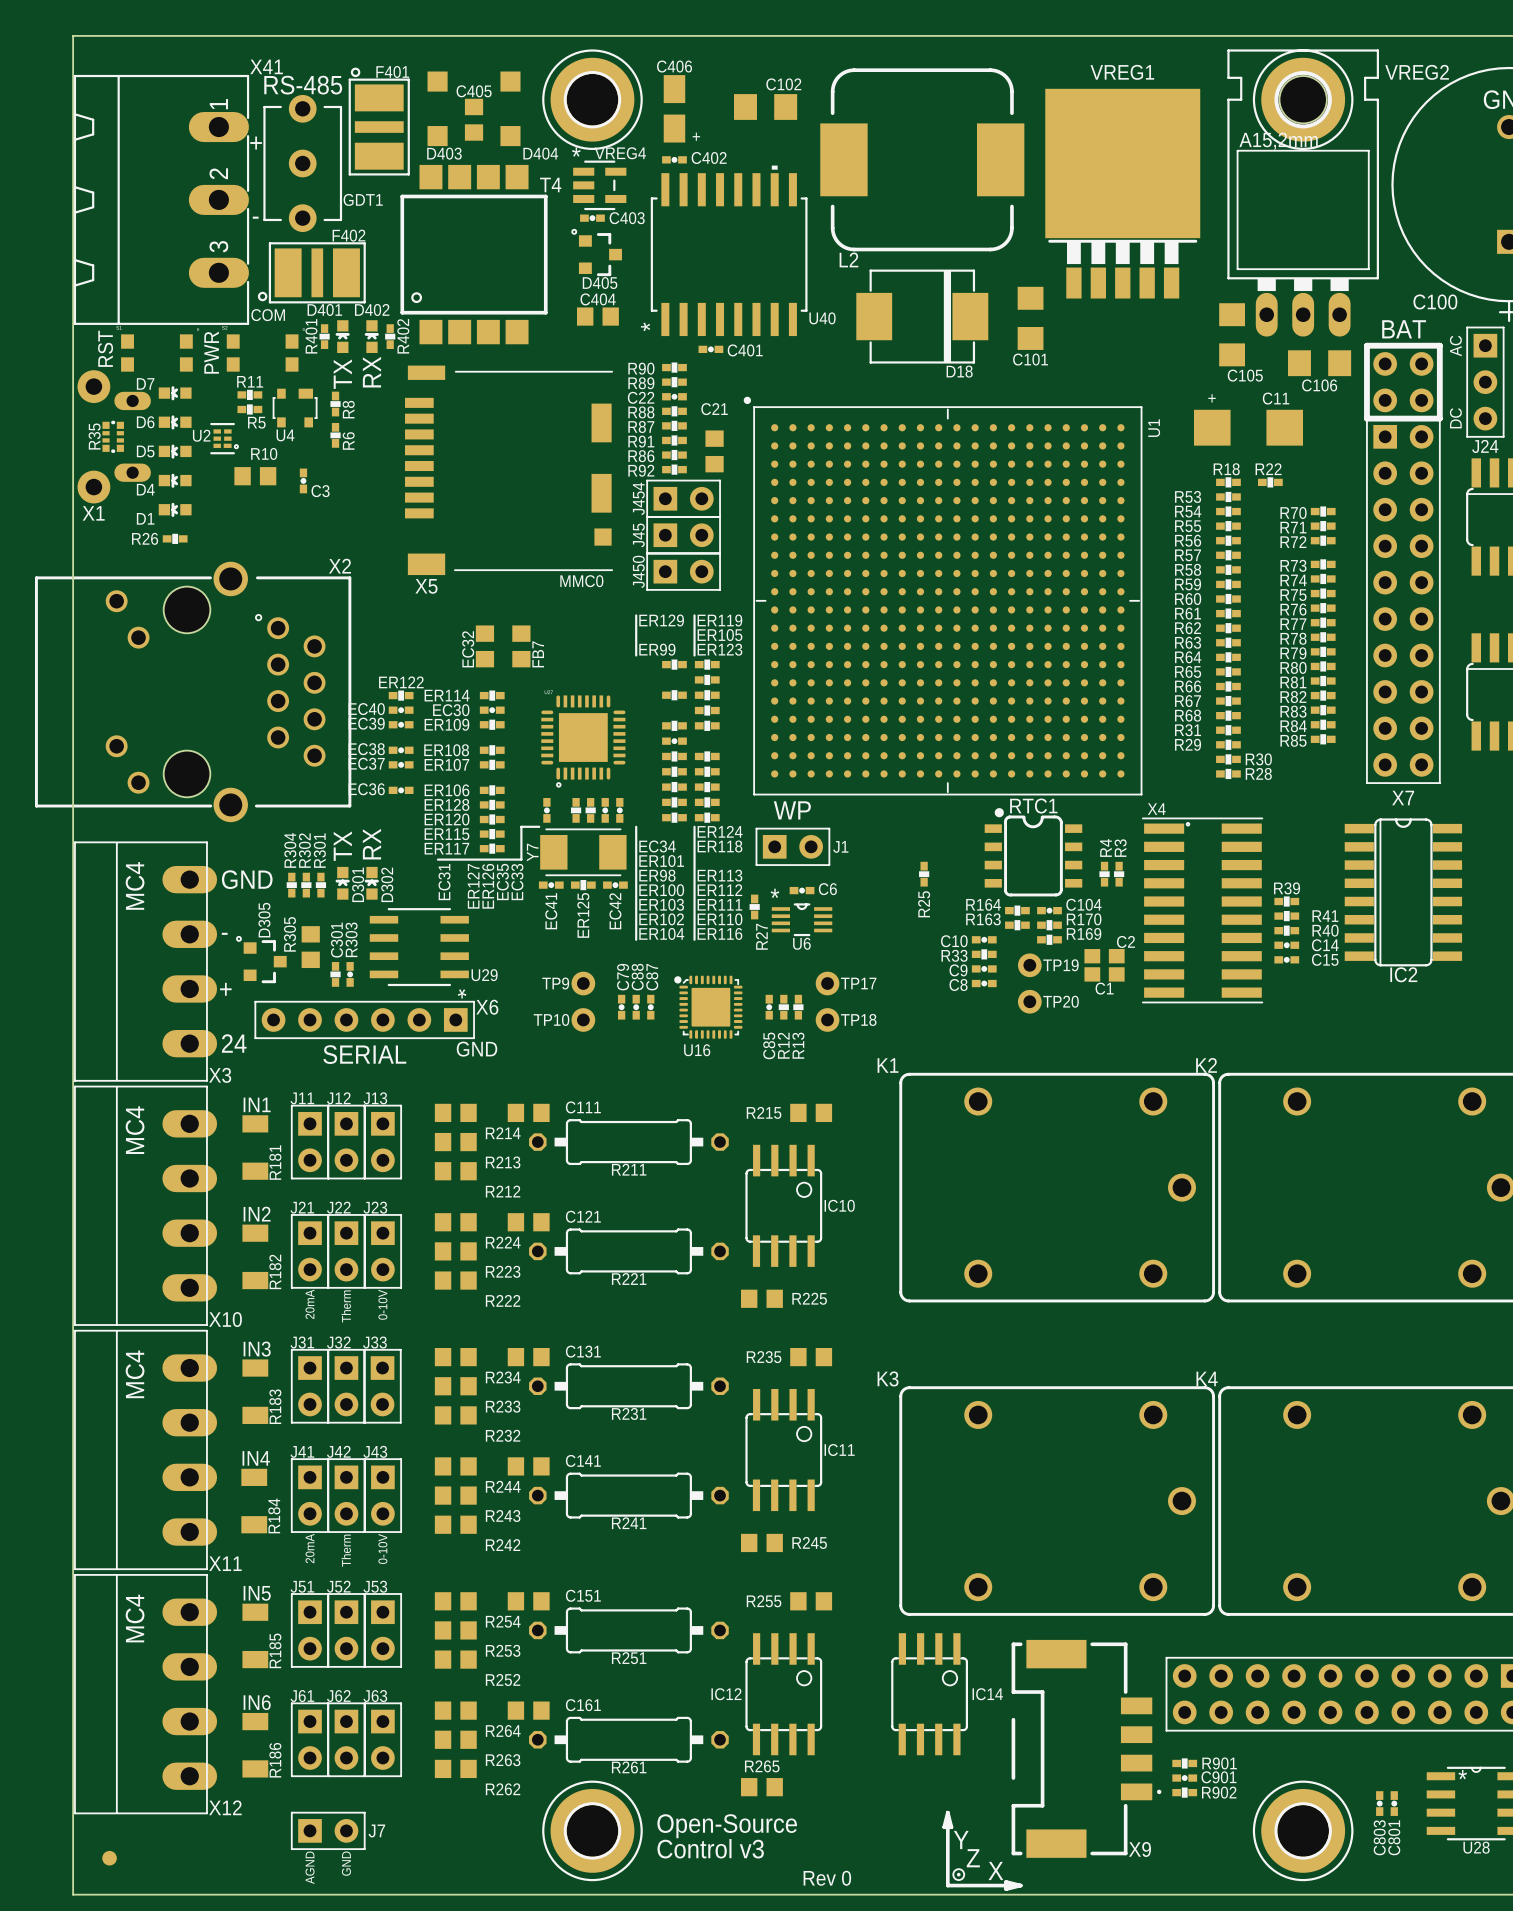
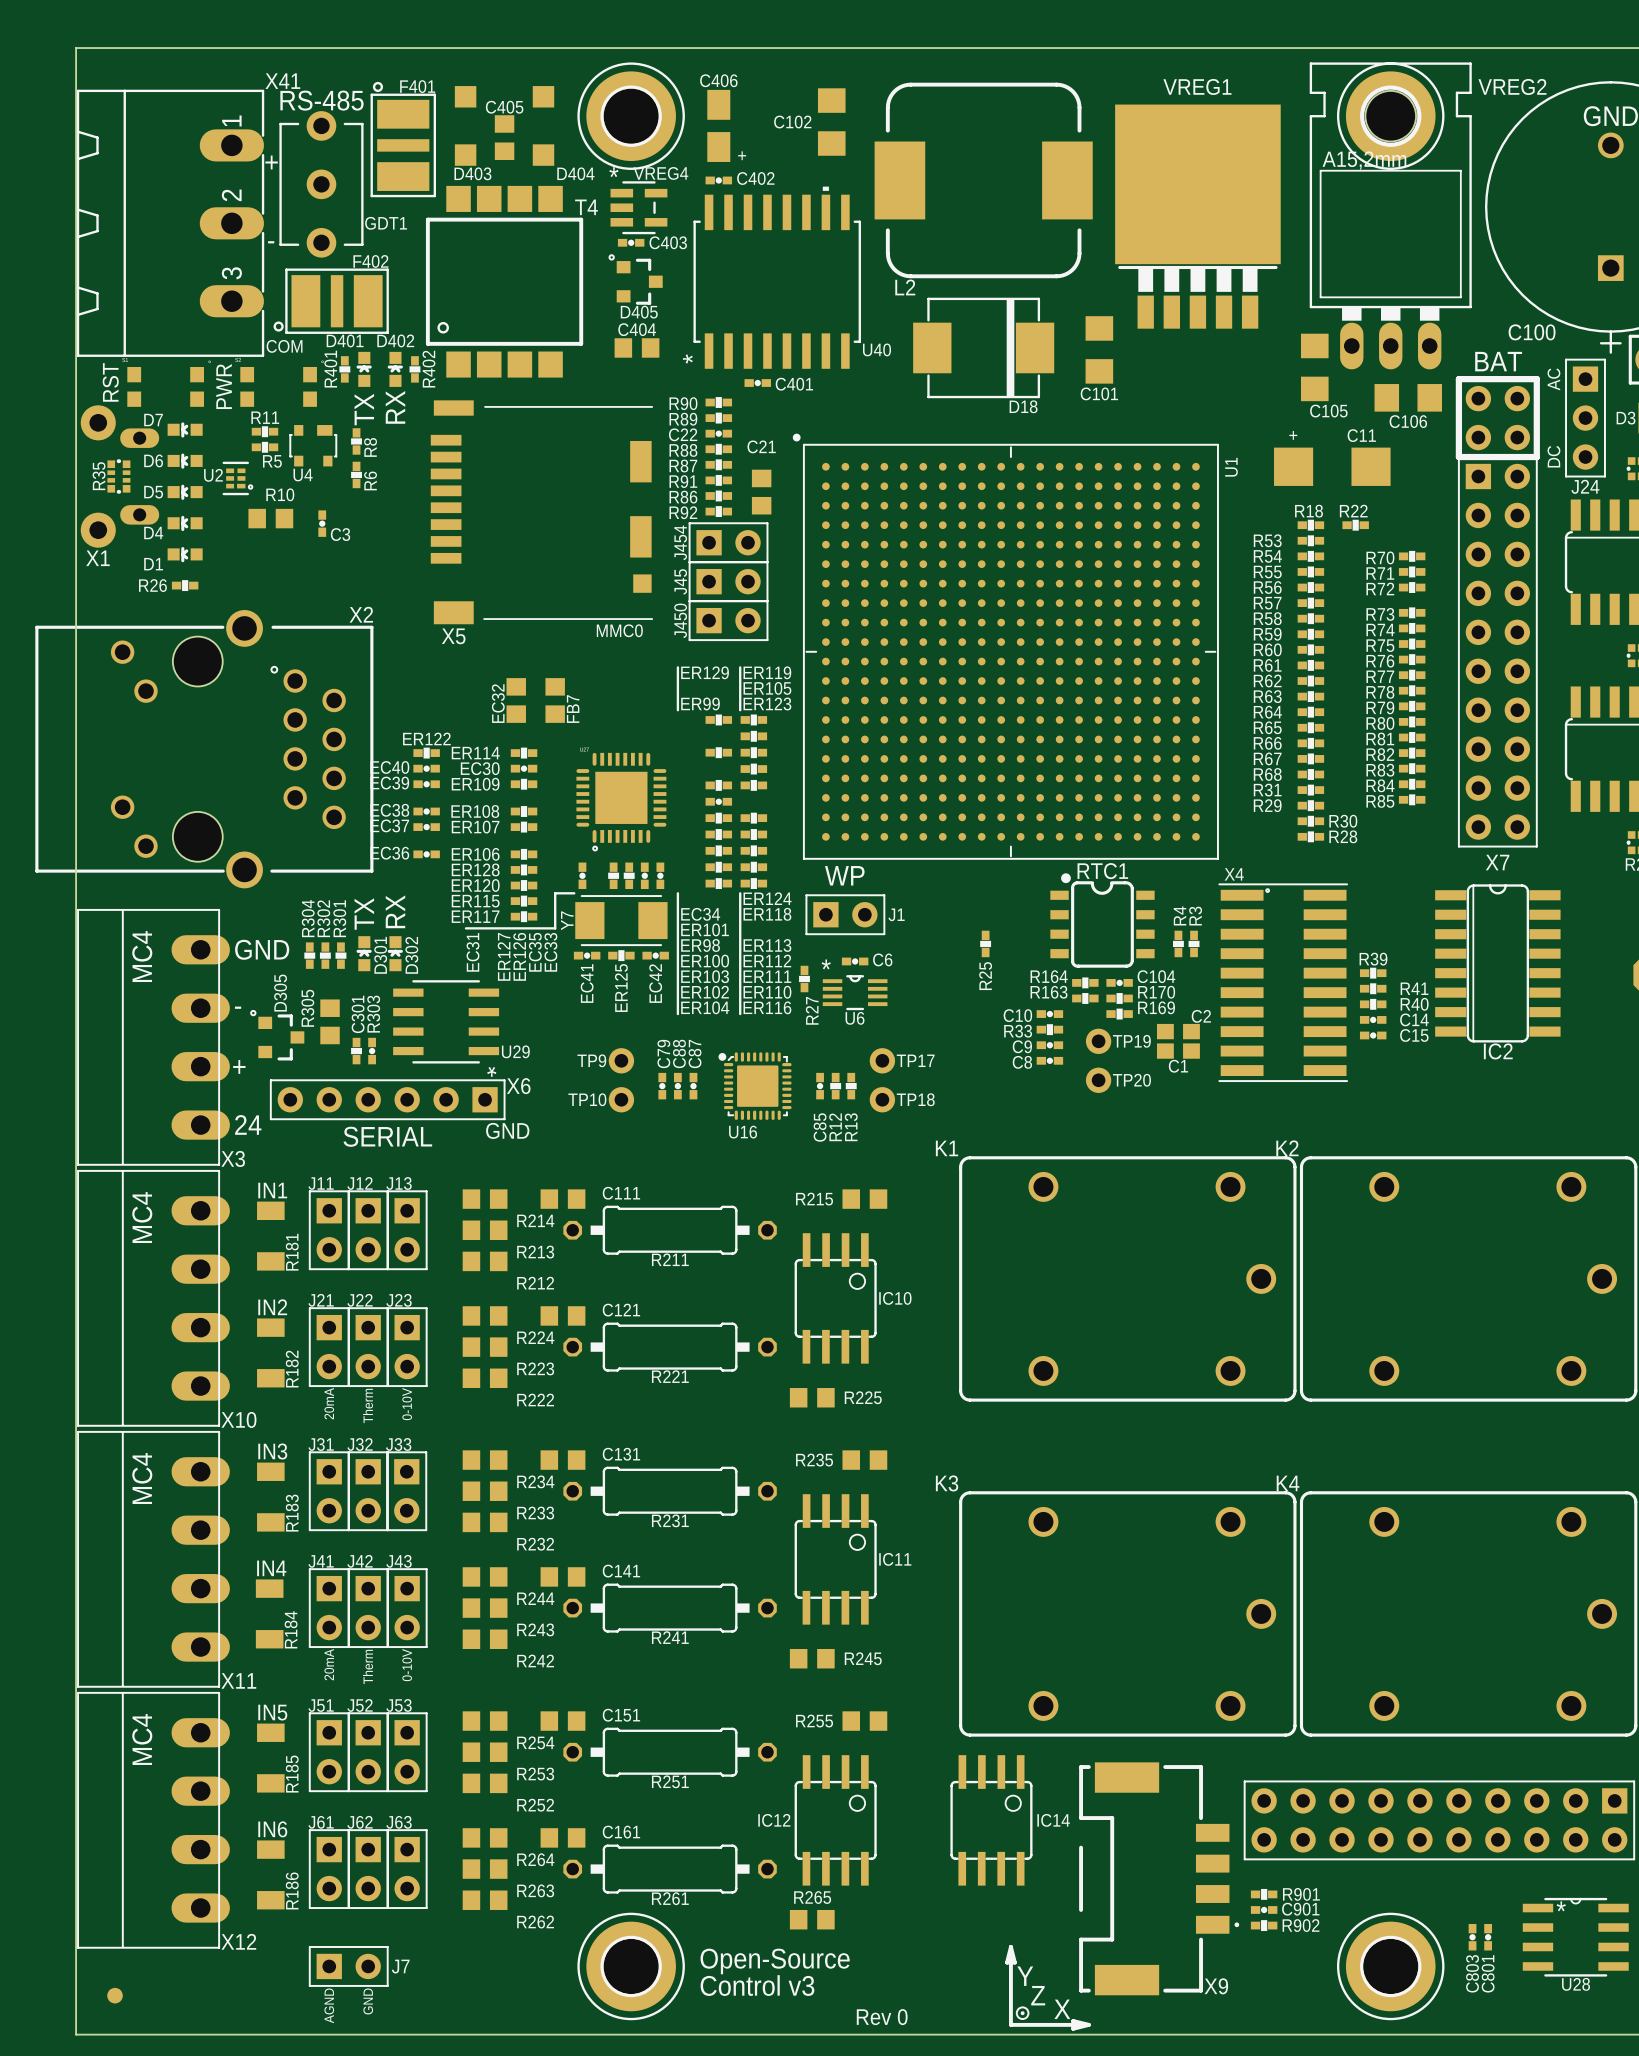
C102 name position: C102 (783, 84) -> C102 (792, 122)
C102 rotation: 0° (765, 106) -> 90° clockwise (831, 122)

